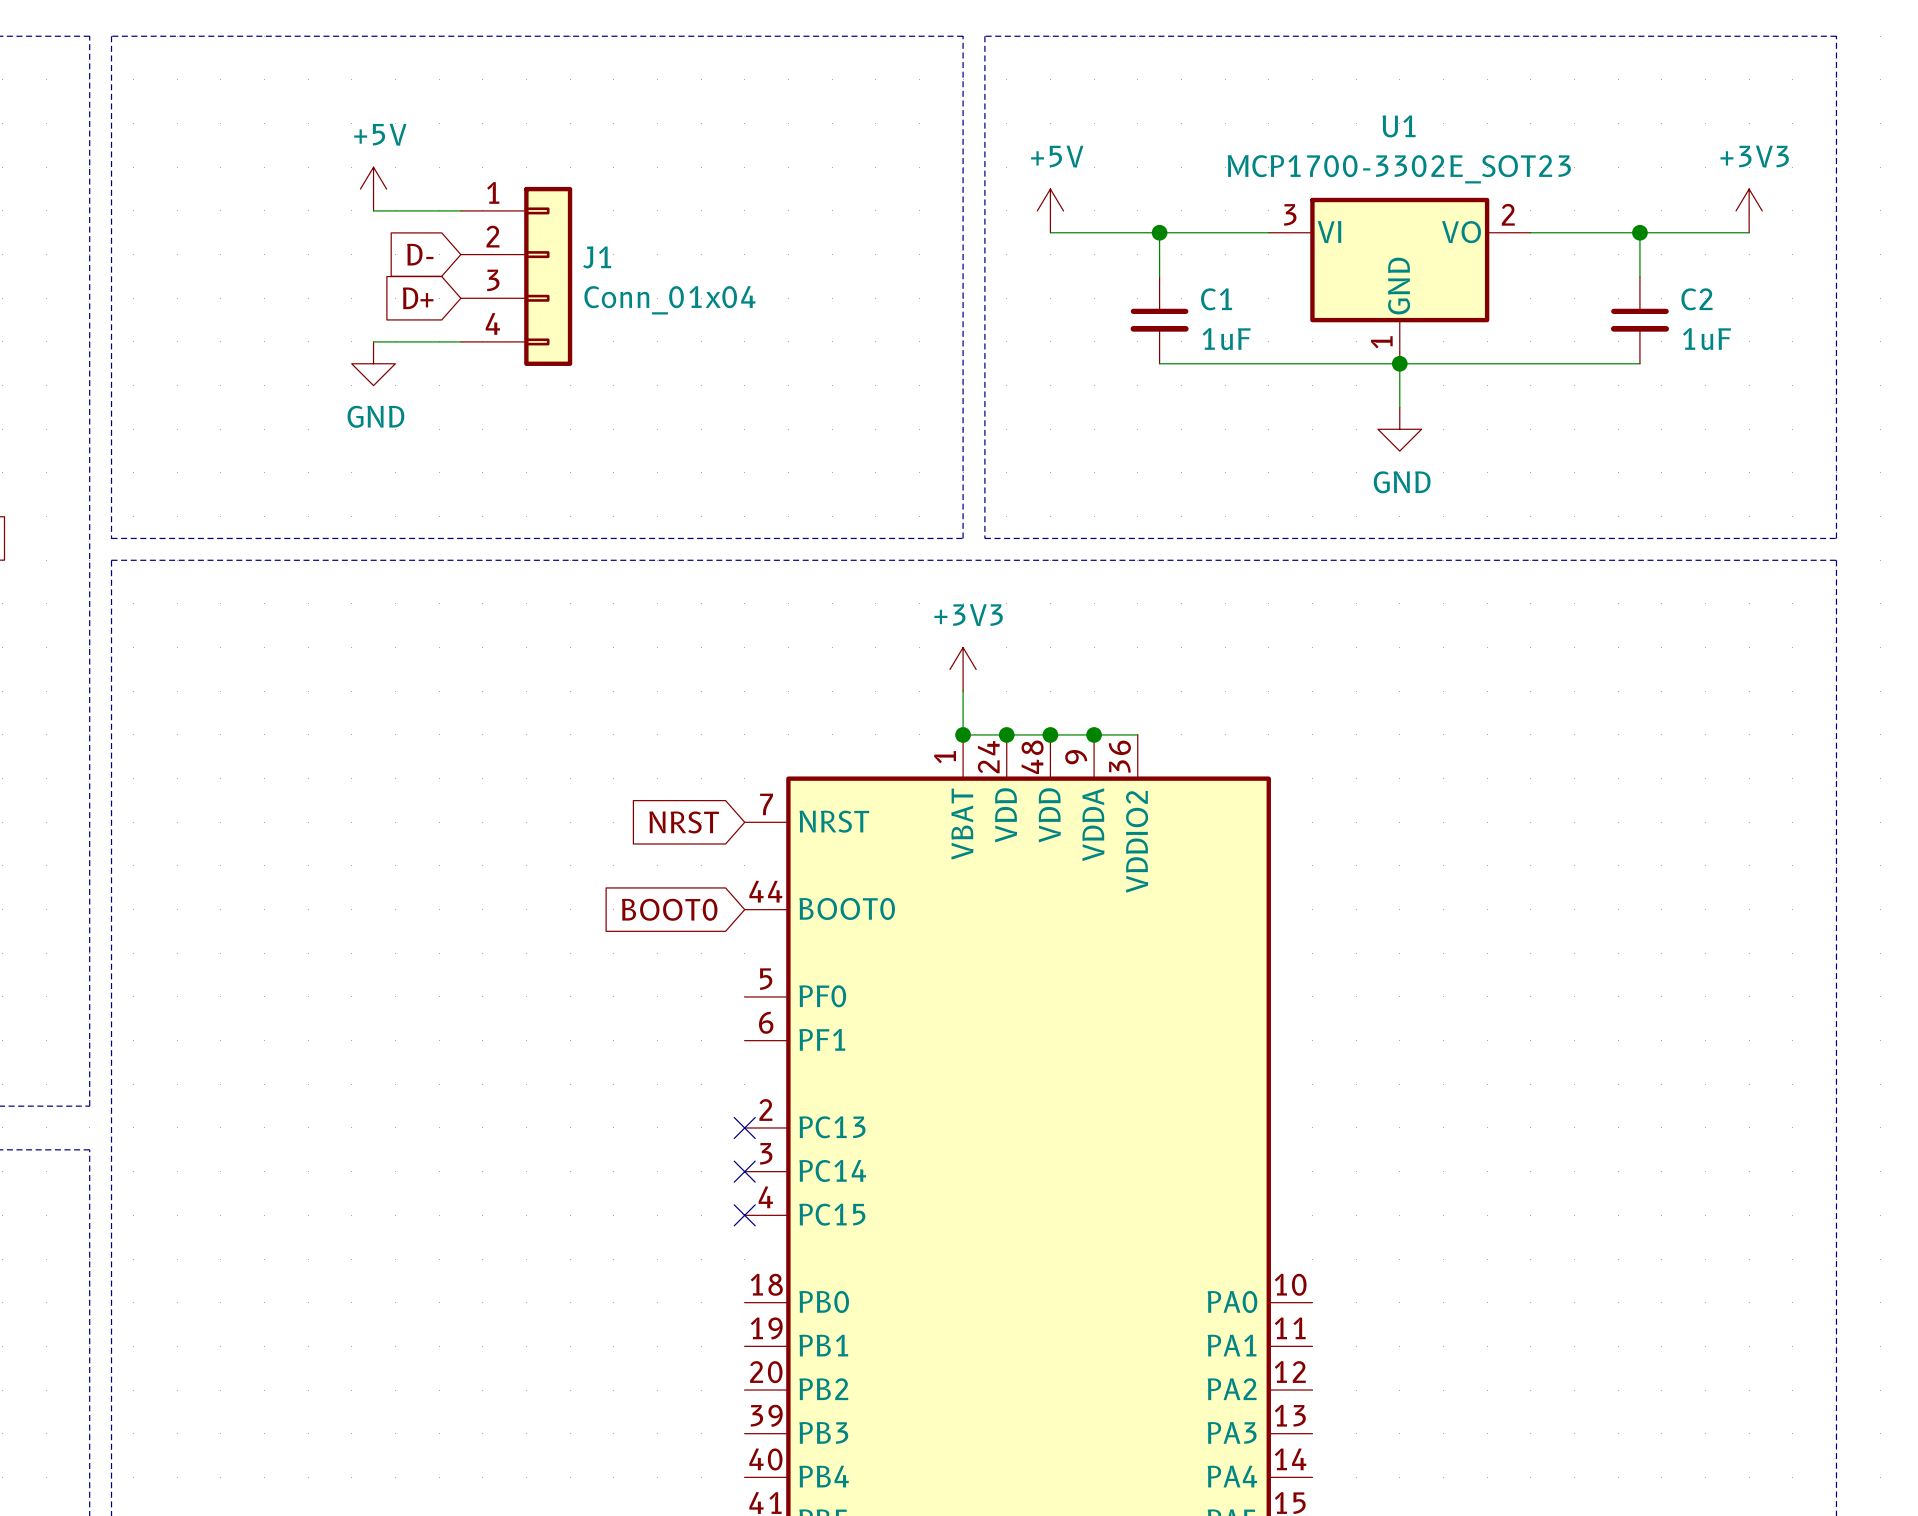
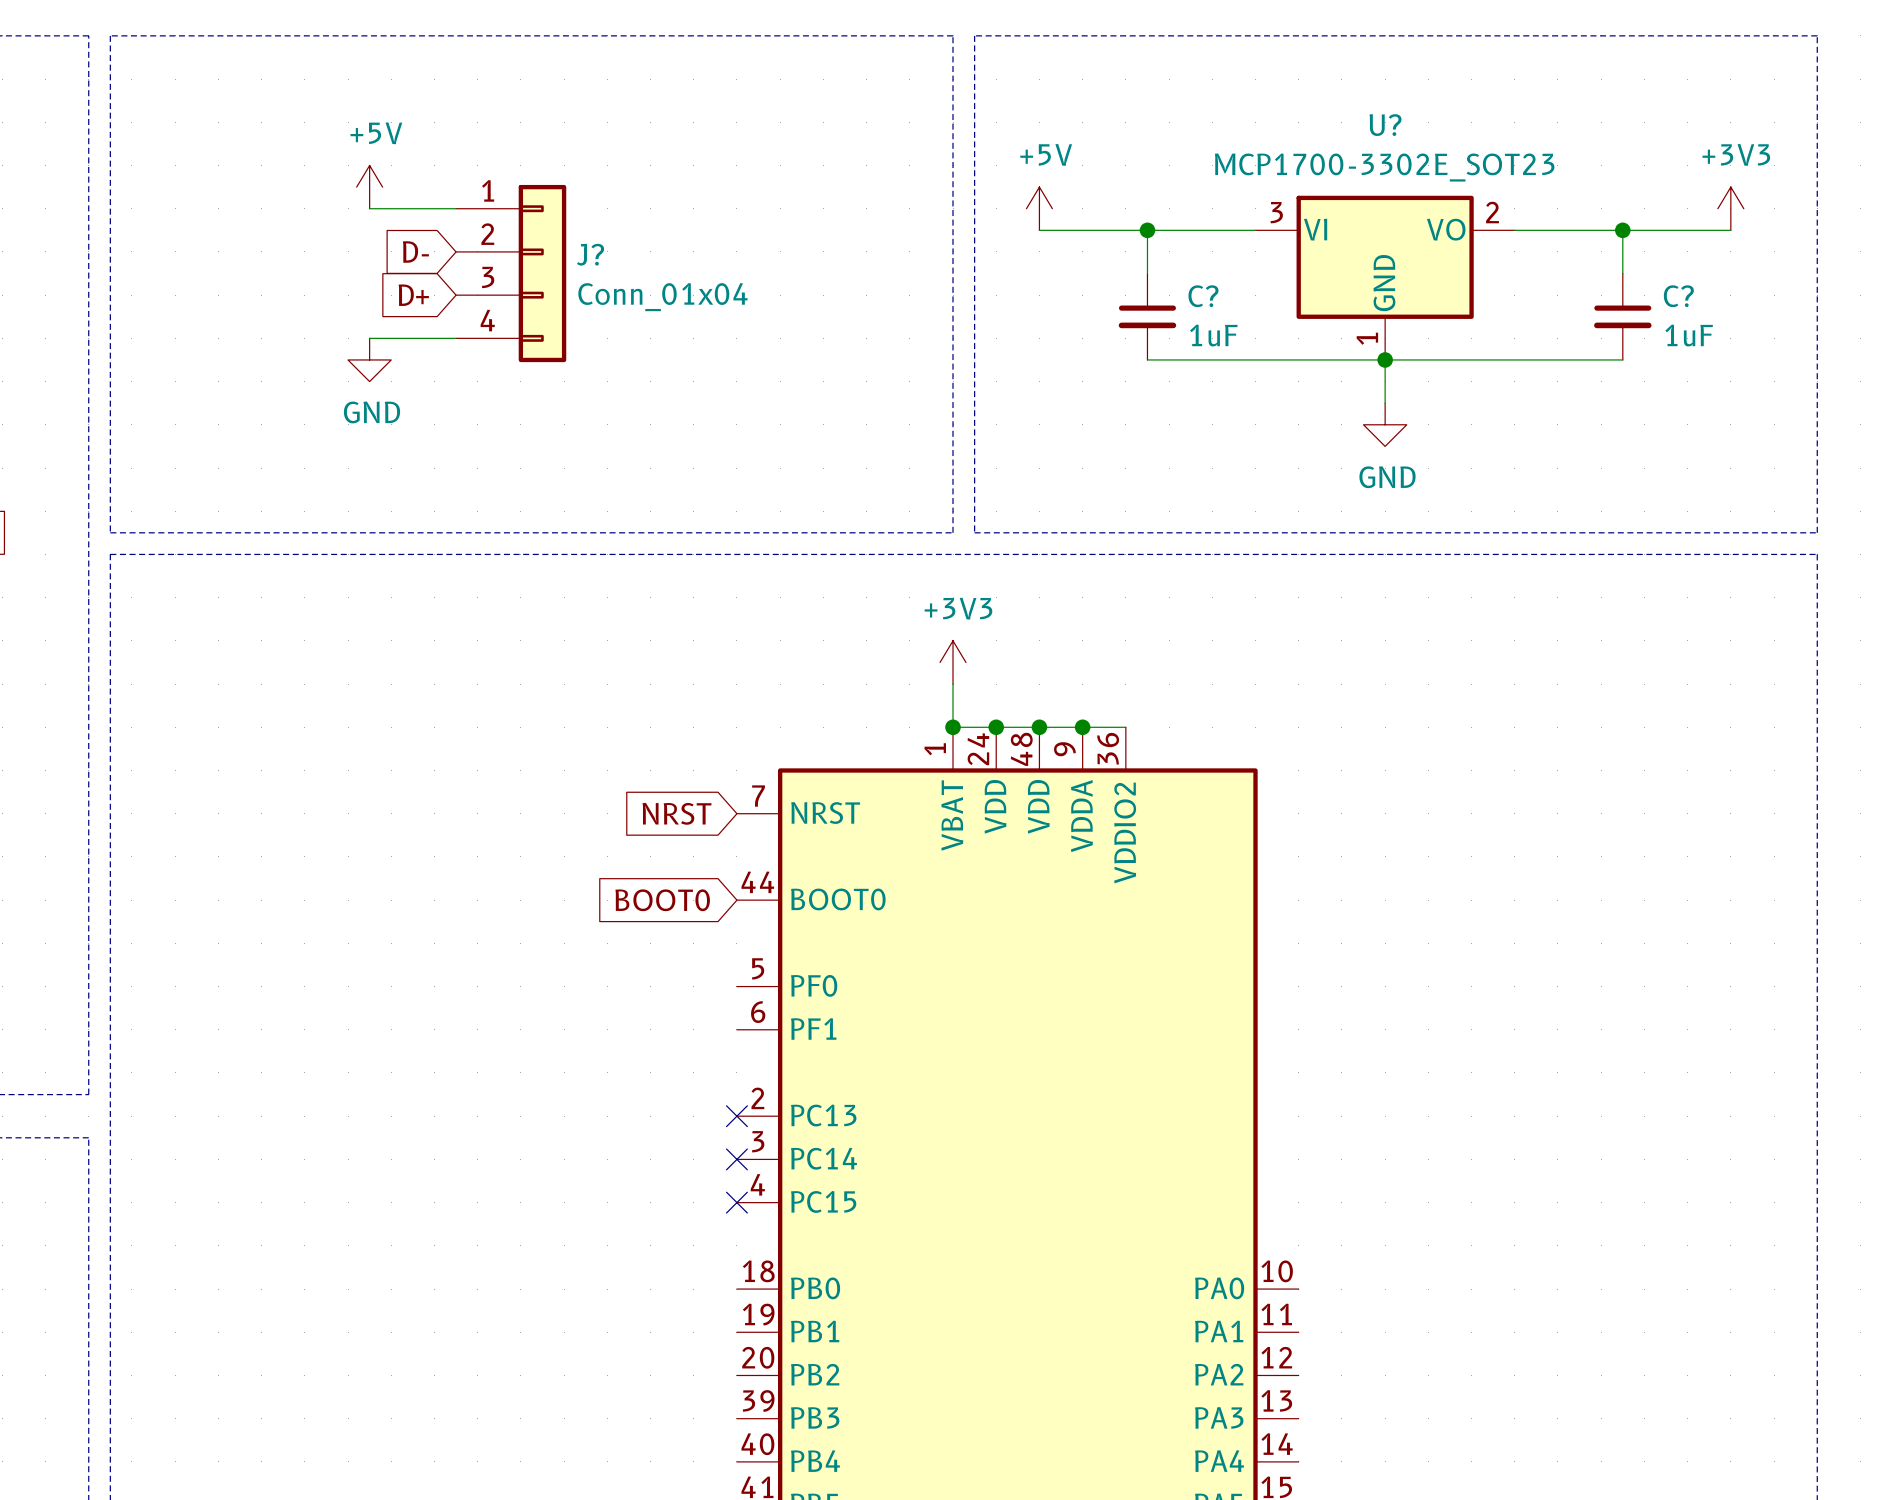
U1 name: U1 (1399, 126) -> U? (1385, 125)
J1 name: J1 (597, 257) -> J? (590, 254)
C1 name: C1 (1216, 299) -> C? (1203, 296)
C2 name: C2 (1696, 299) -> C? (1678, 296)

